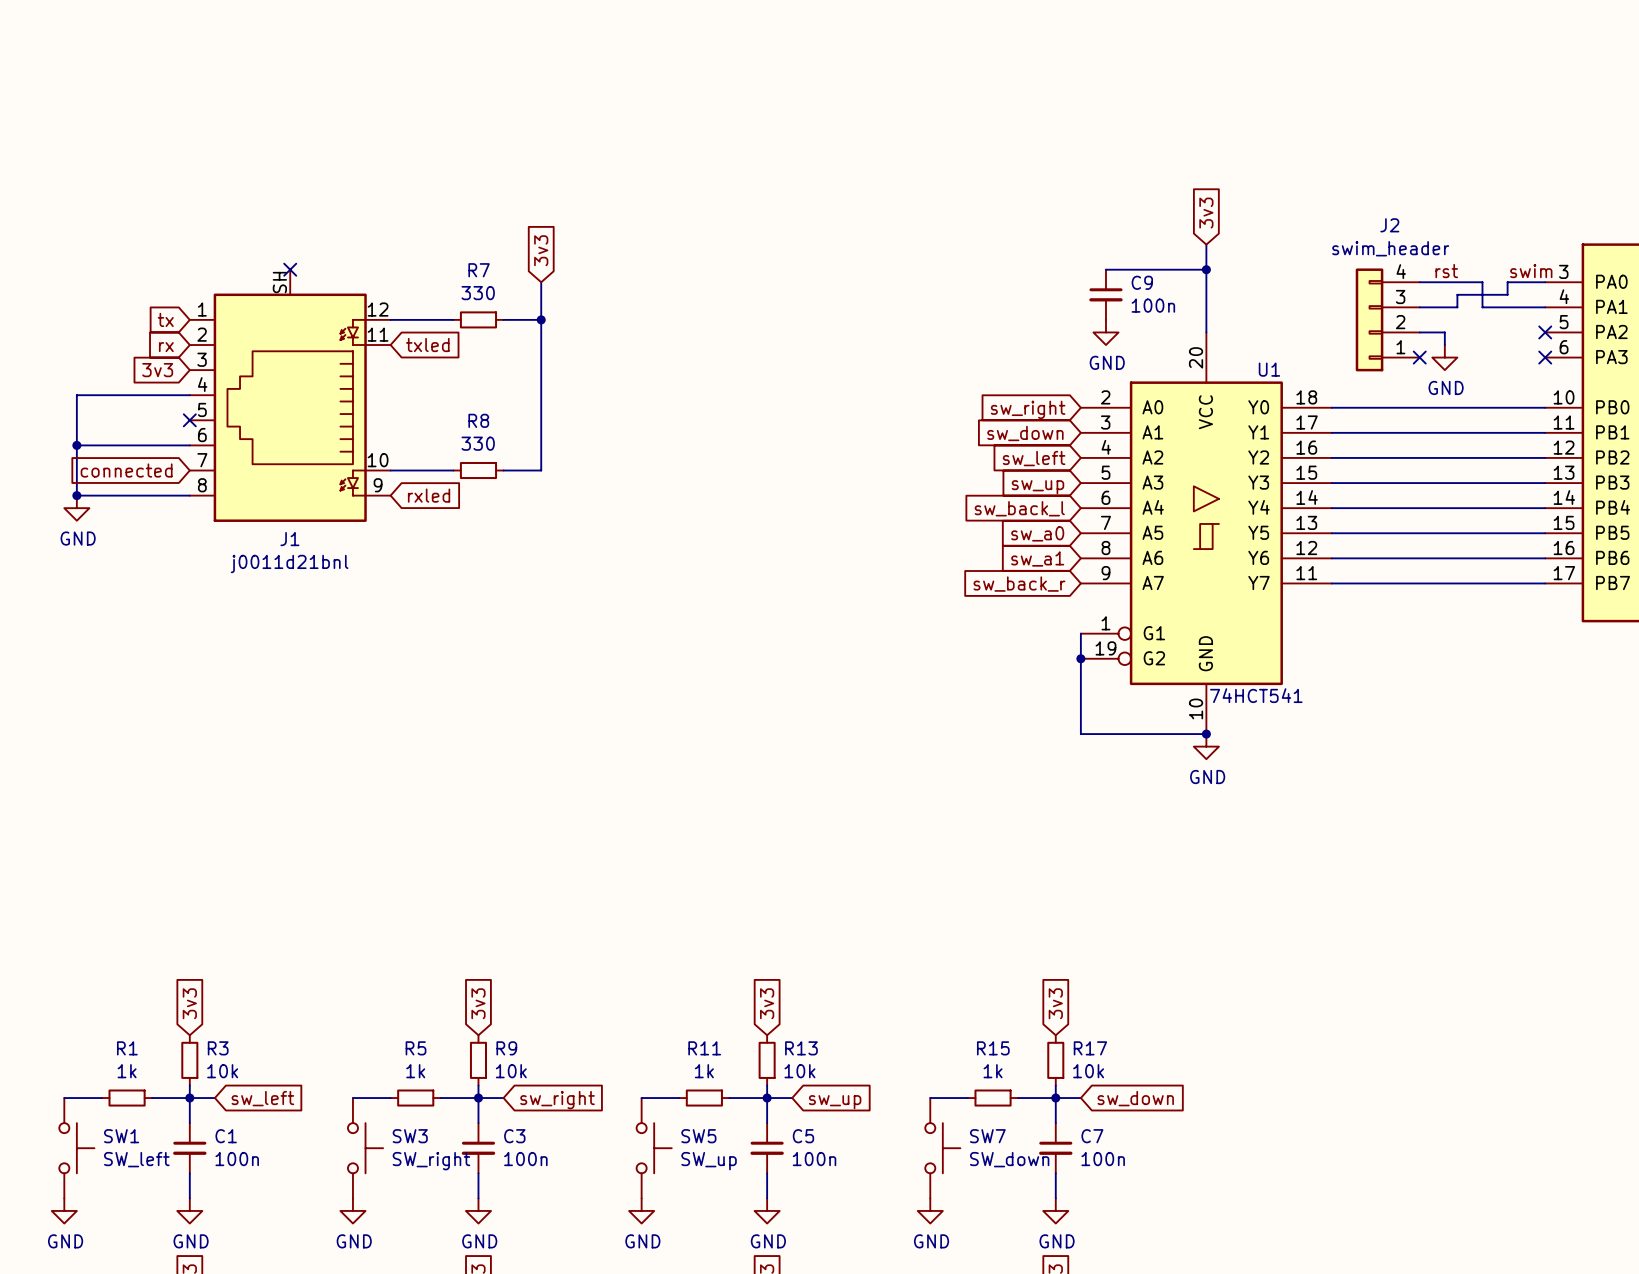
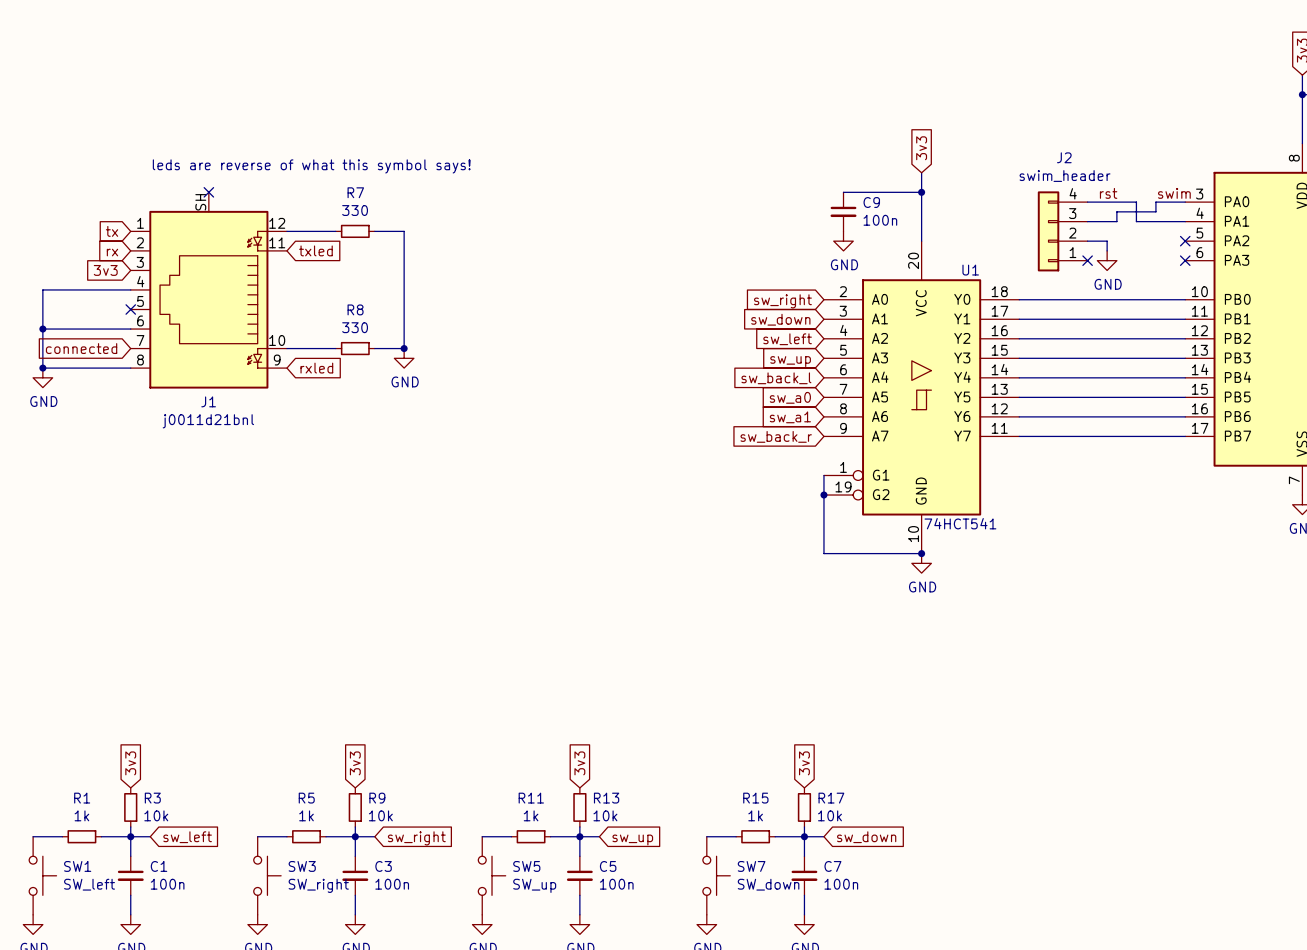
text: none -> leds are reverse of what this symbol says! (311, 166)
global label: 3v3 (541, 250) -> none
wire: (541, 282) (541, 319) -> none
junction: (541, 319) -> none
junction: none -> (404, 348)
power symbol: none -> GND (404, 358)

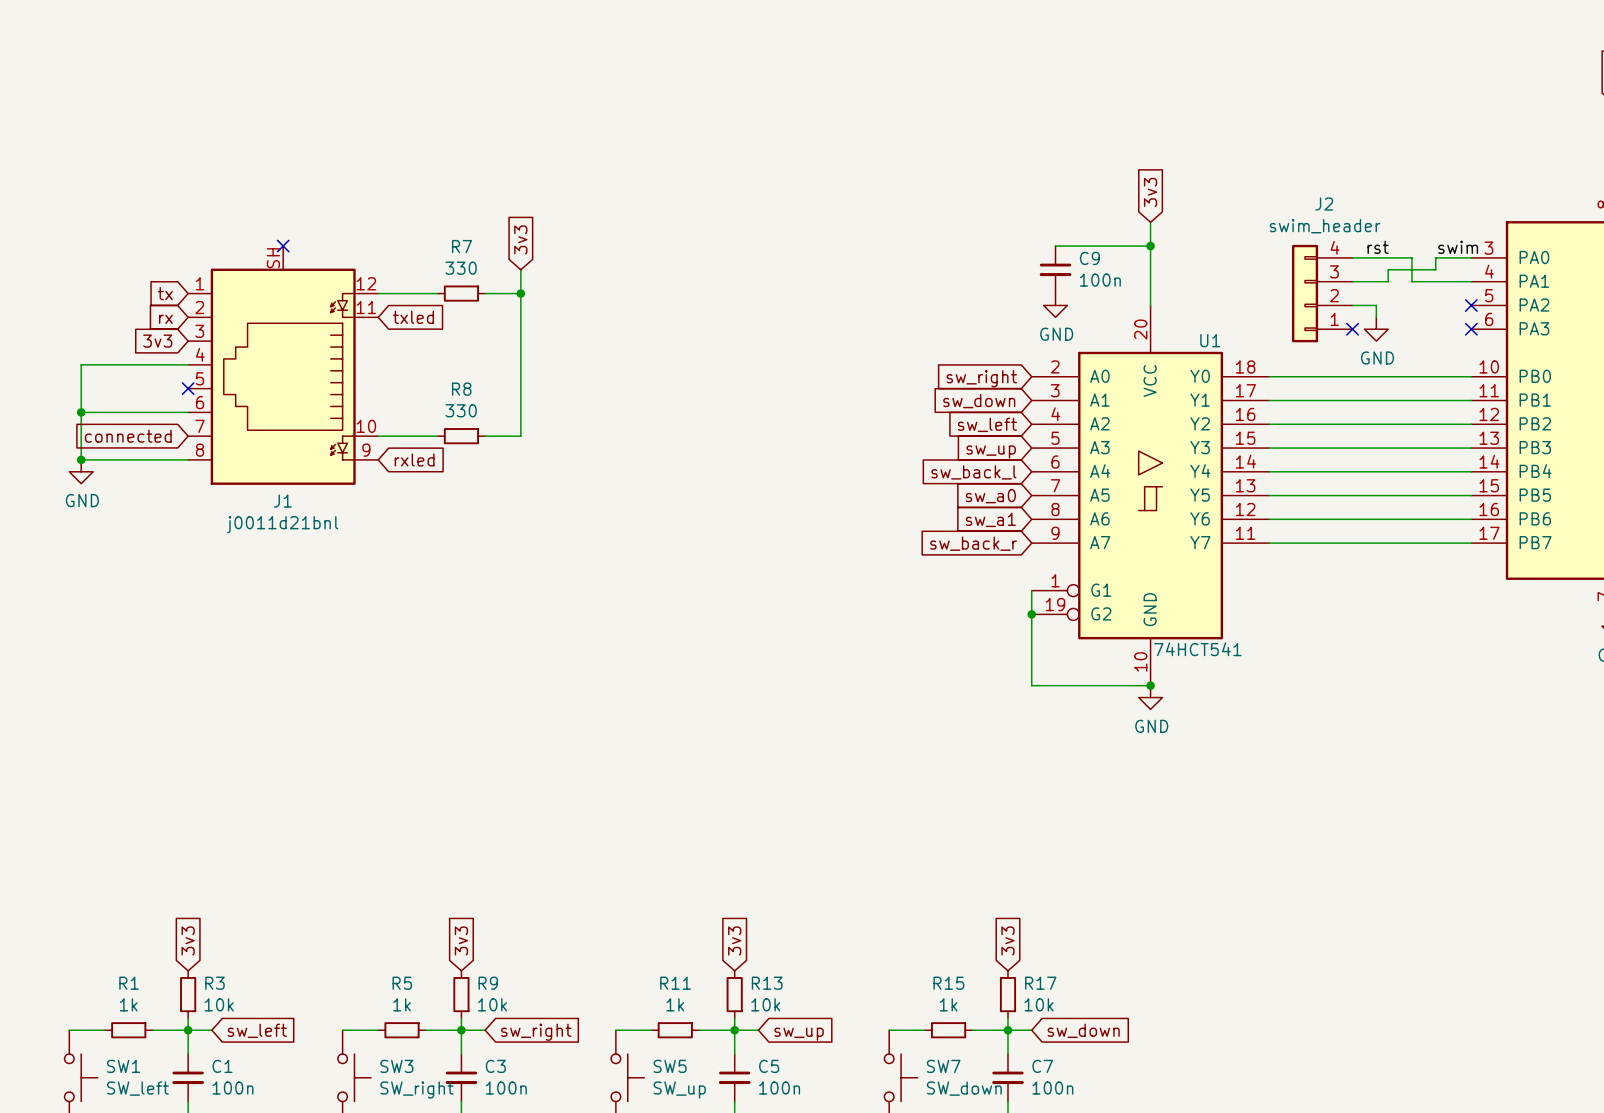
text: leds are reverse of what this symbol says! (311, 166) -> none
global label: none -> 3v3 (520, 239)
wire: none -> (520, 269) (520, 293)
junction: none -> (520, 293)
junction: (404, 348) -> none
power symbol: GND (404, 358) -> none

